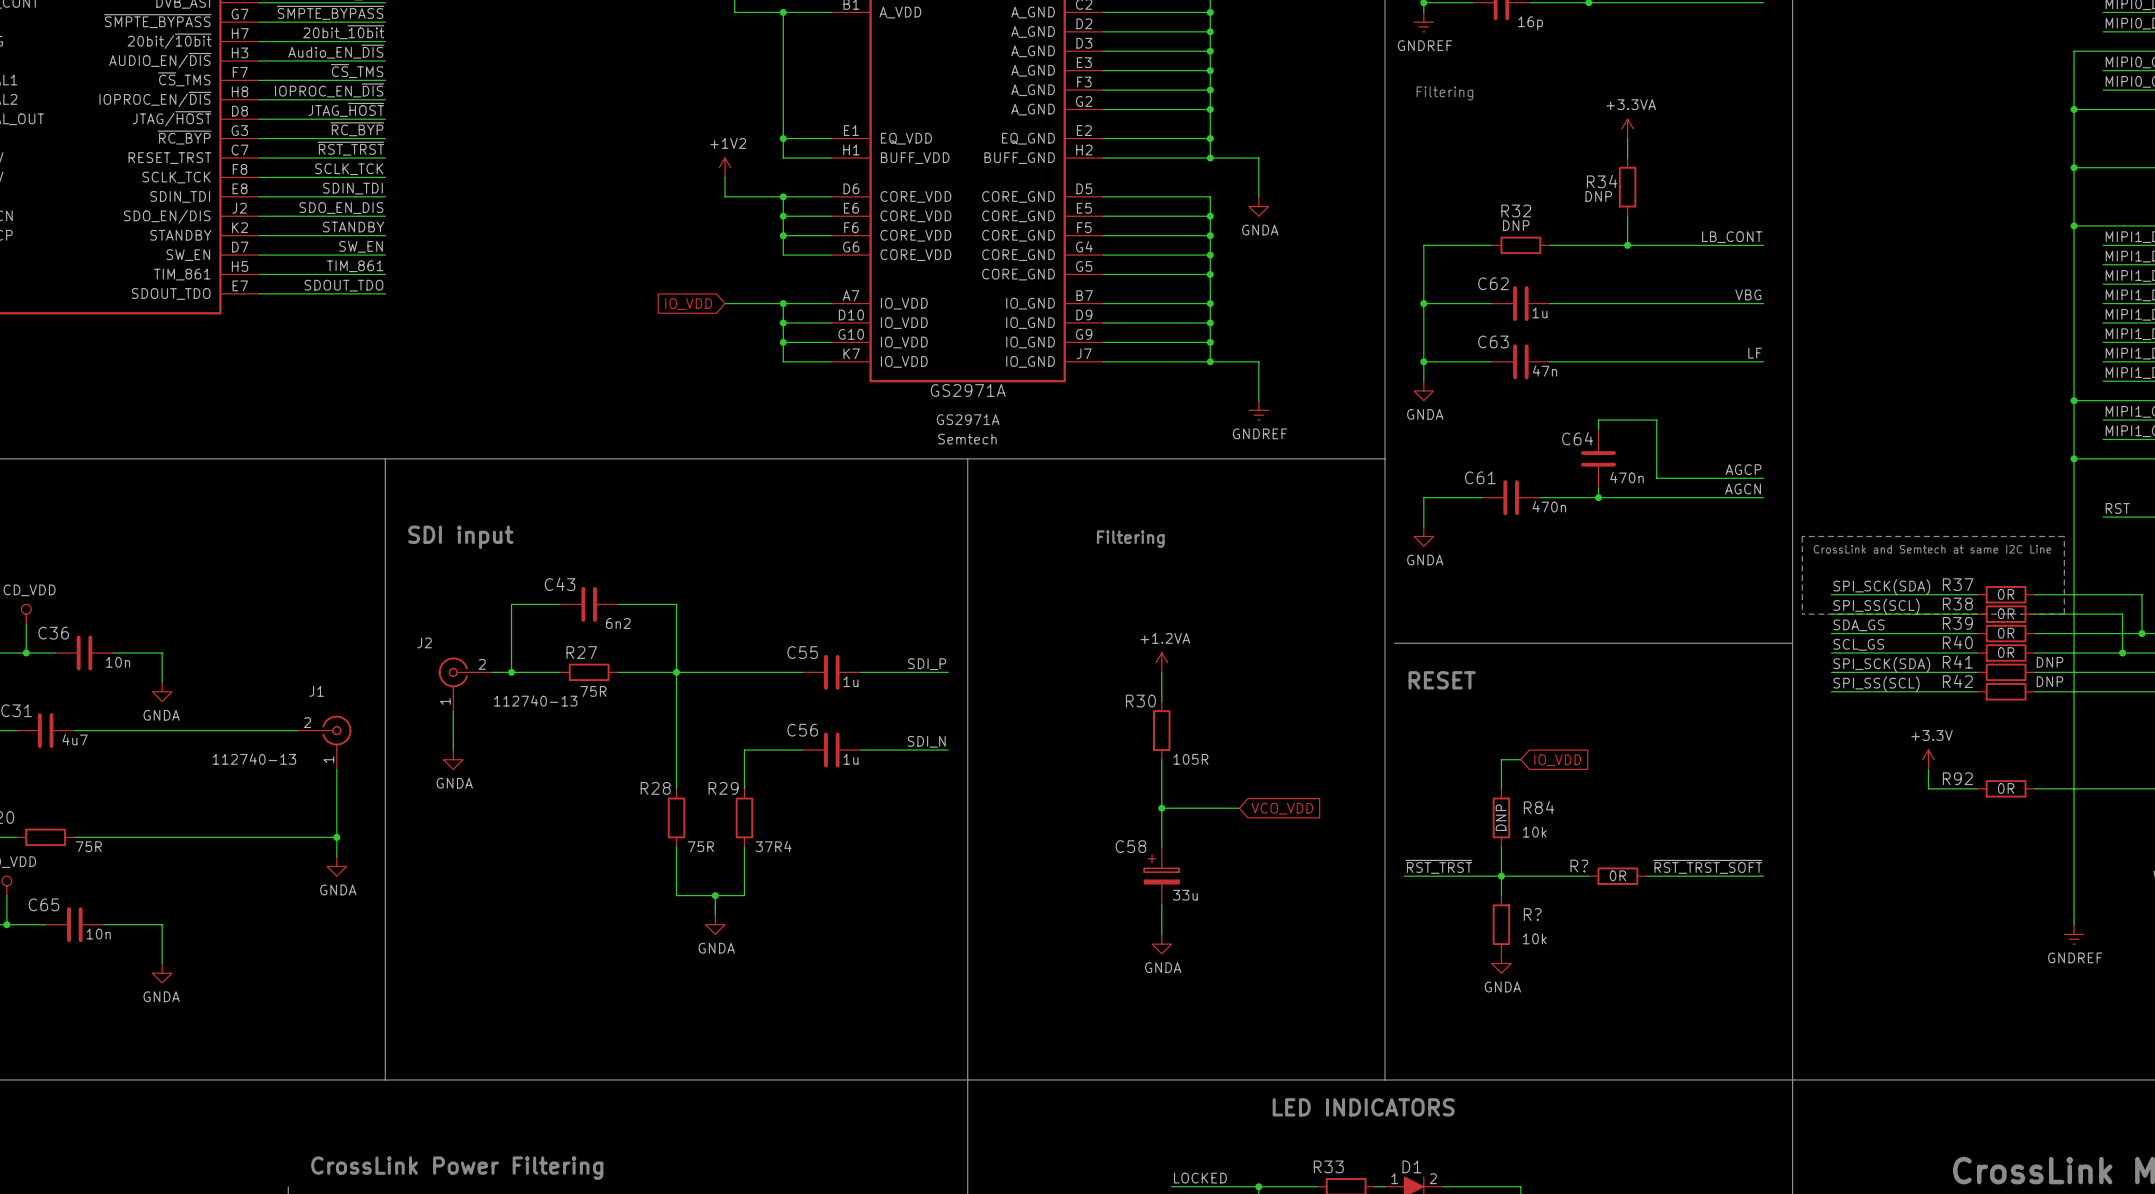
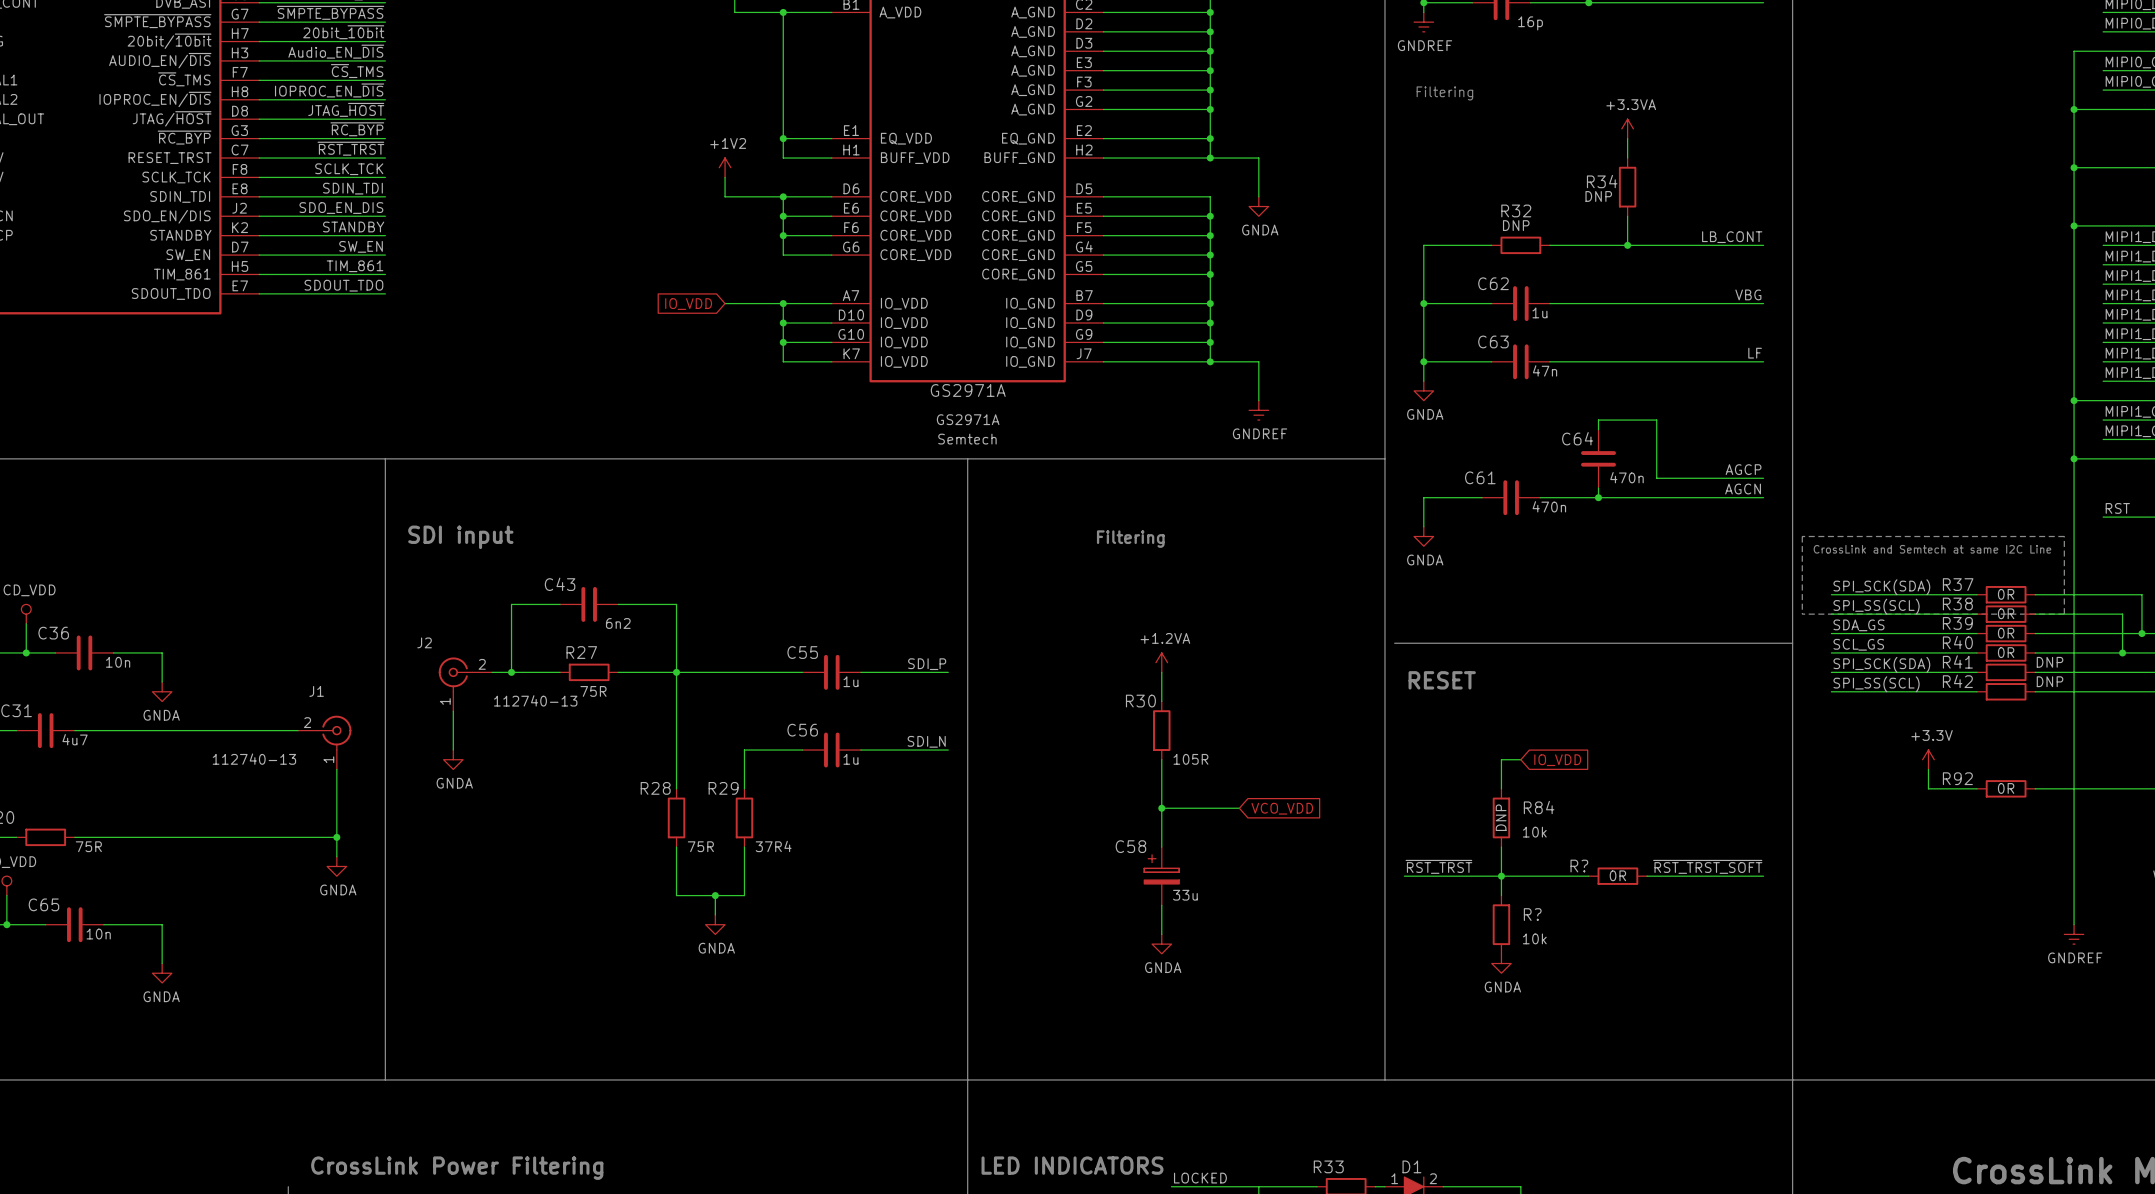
text: LED INDICATORS (1363, 1107) -> none
text: none -> LED INDICATORS (1072, 1165)
junction: (1258, 1186) -> none

